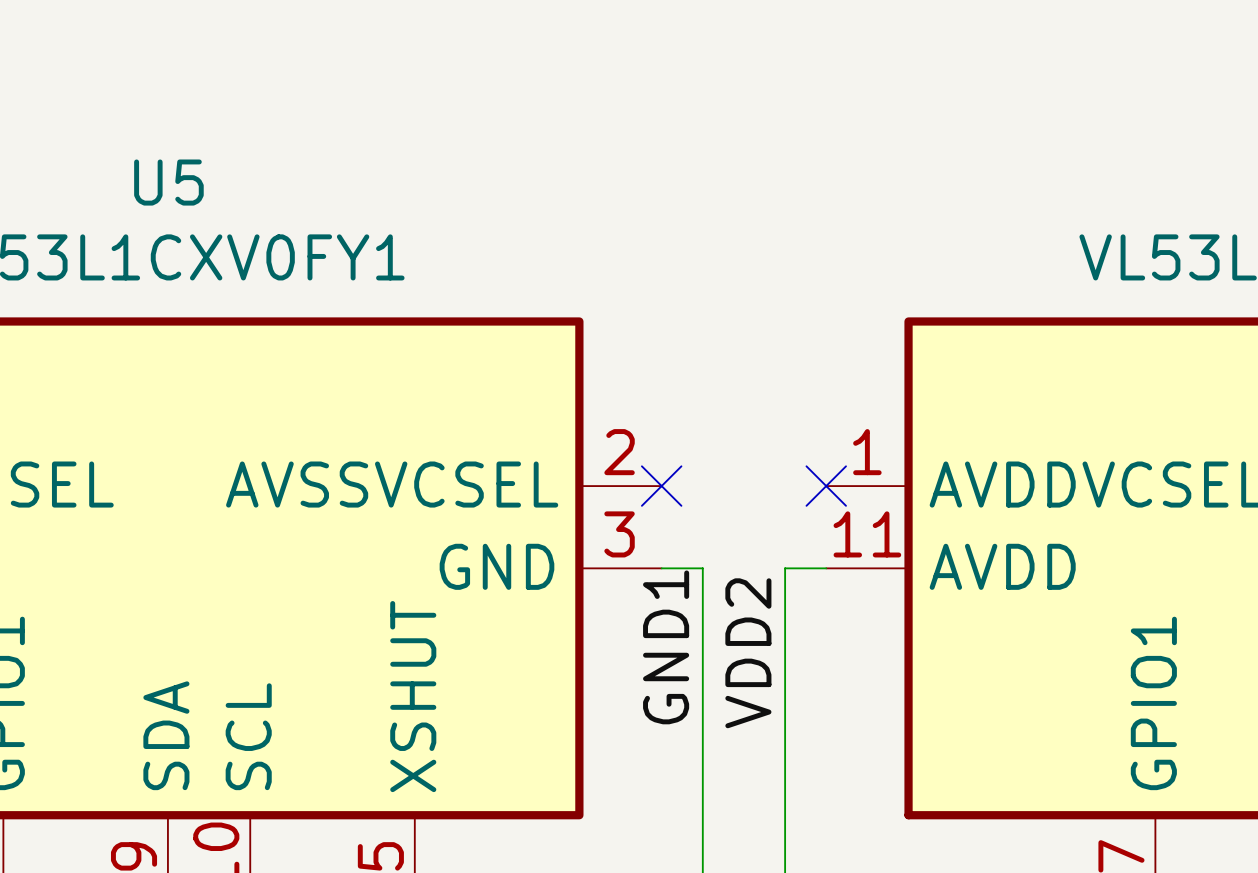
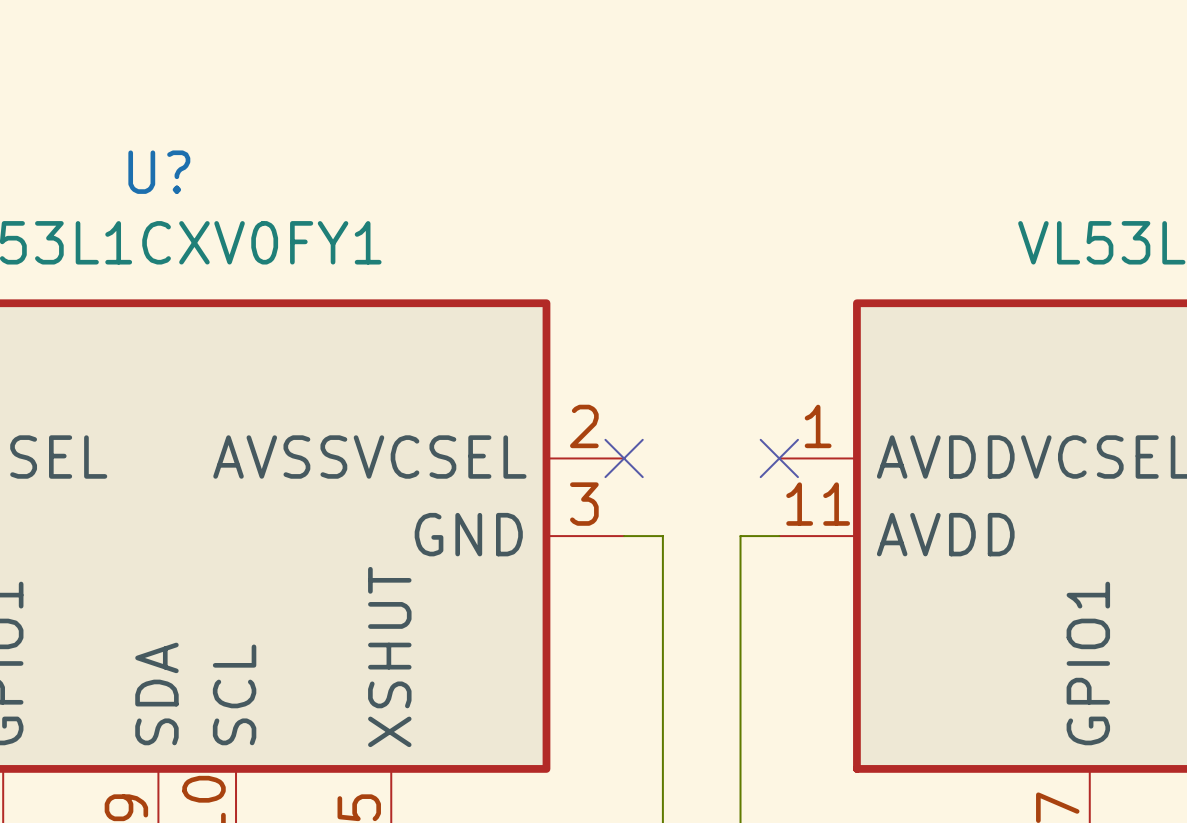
U5 name: U5 (168, 182) -> U? (159, 172)
label: GND1 (666, 647) -> none
label: VDD2 (748, 653) -> none

